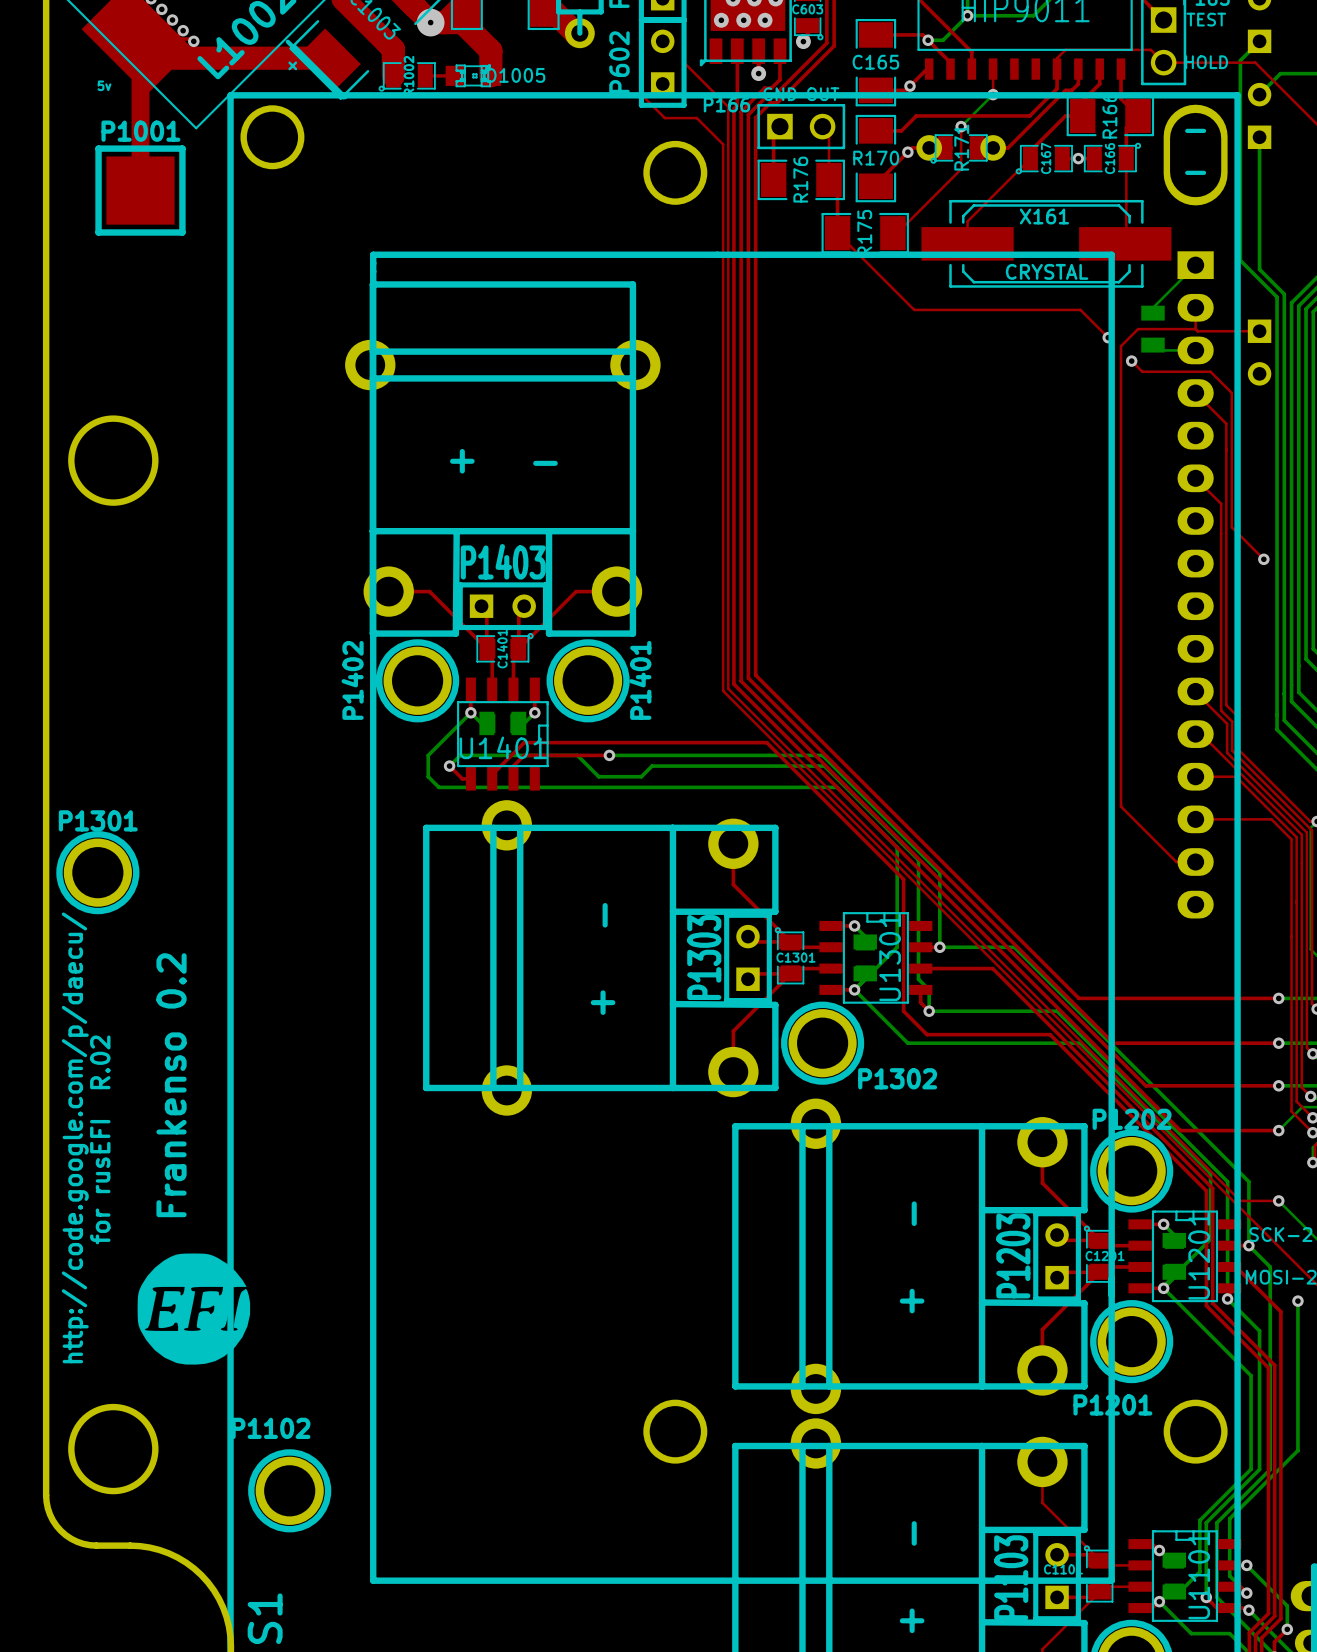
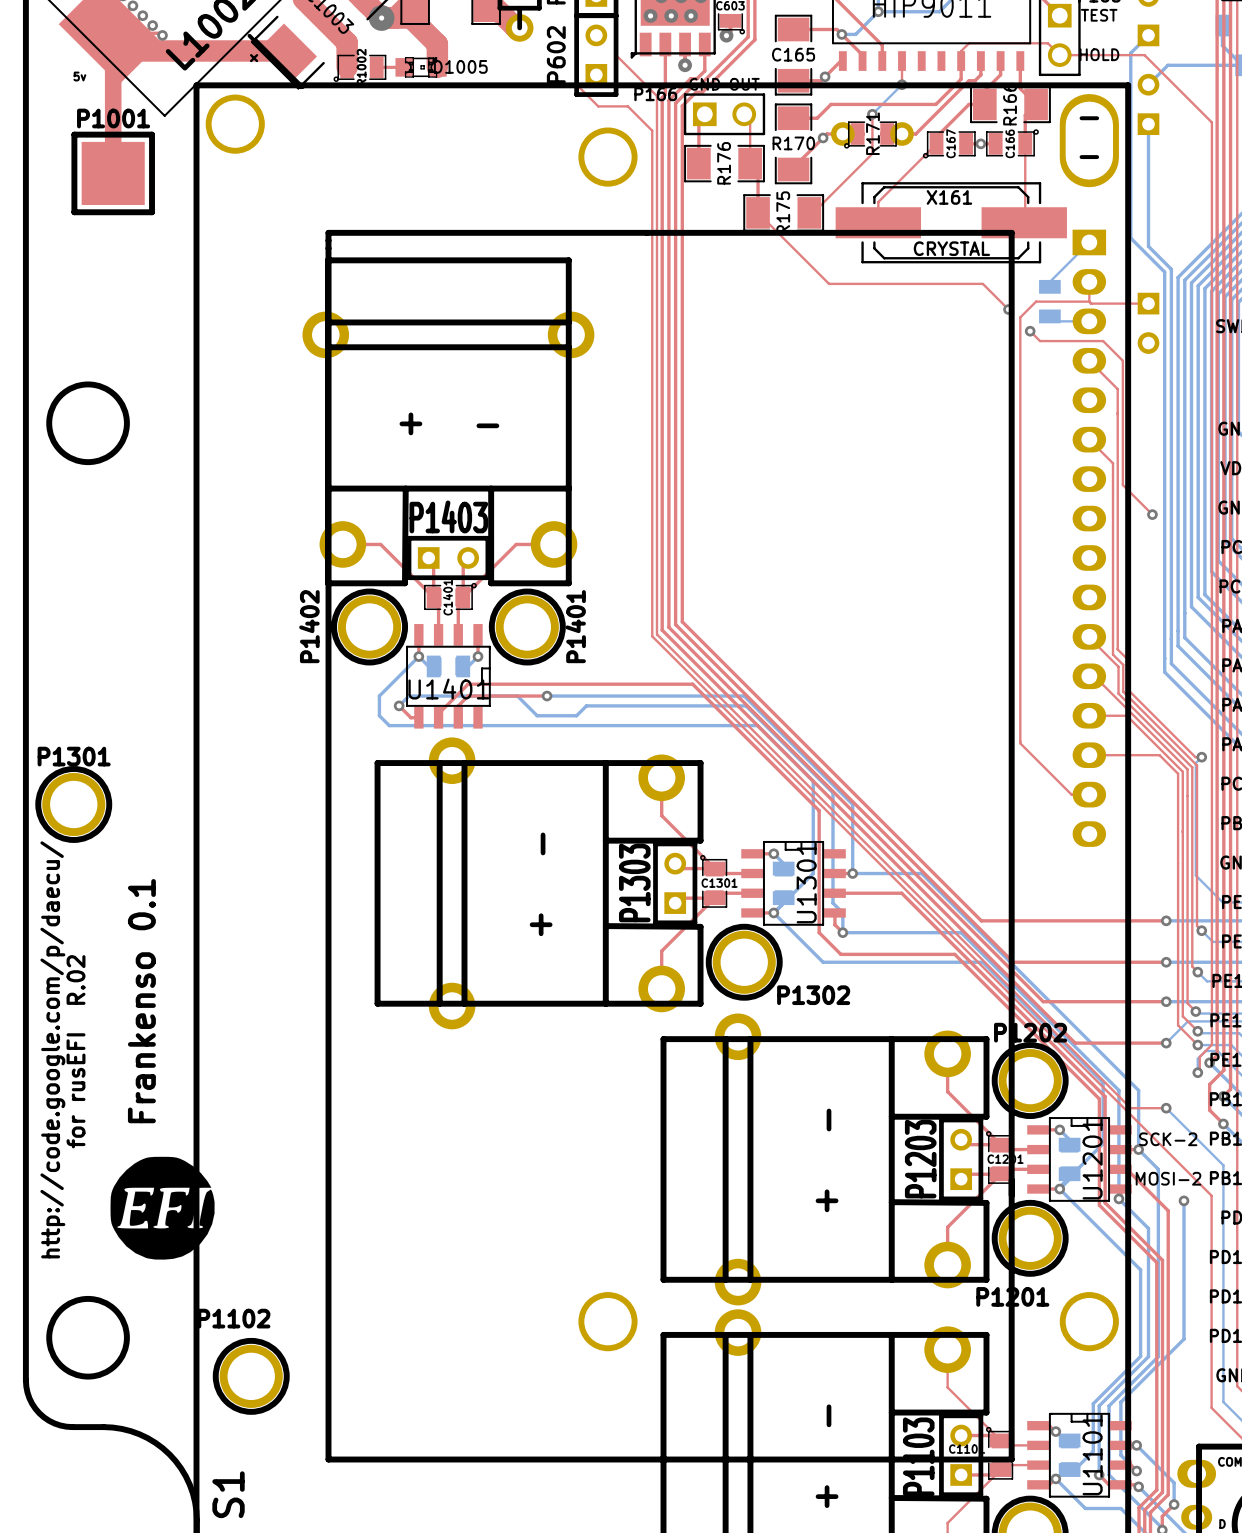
text: Frankenso 0.2 (171, 1085) -> Frankenso 0.1 (141, 1001)

